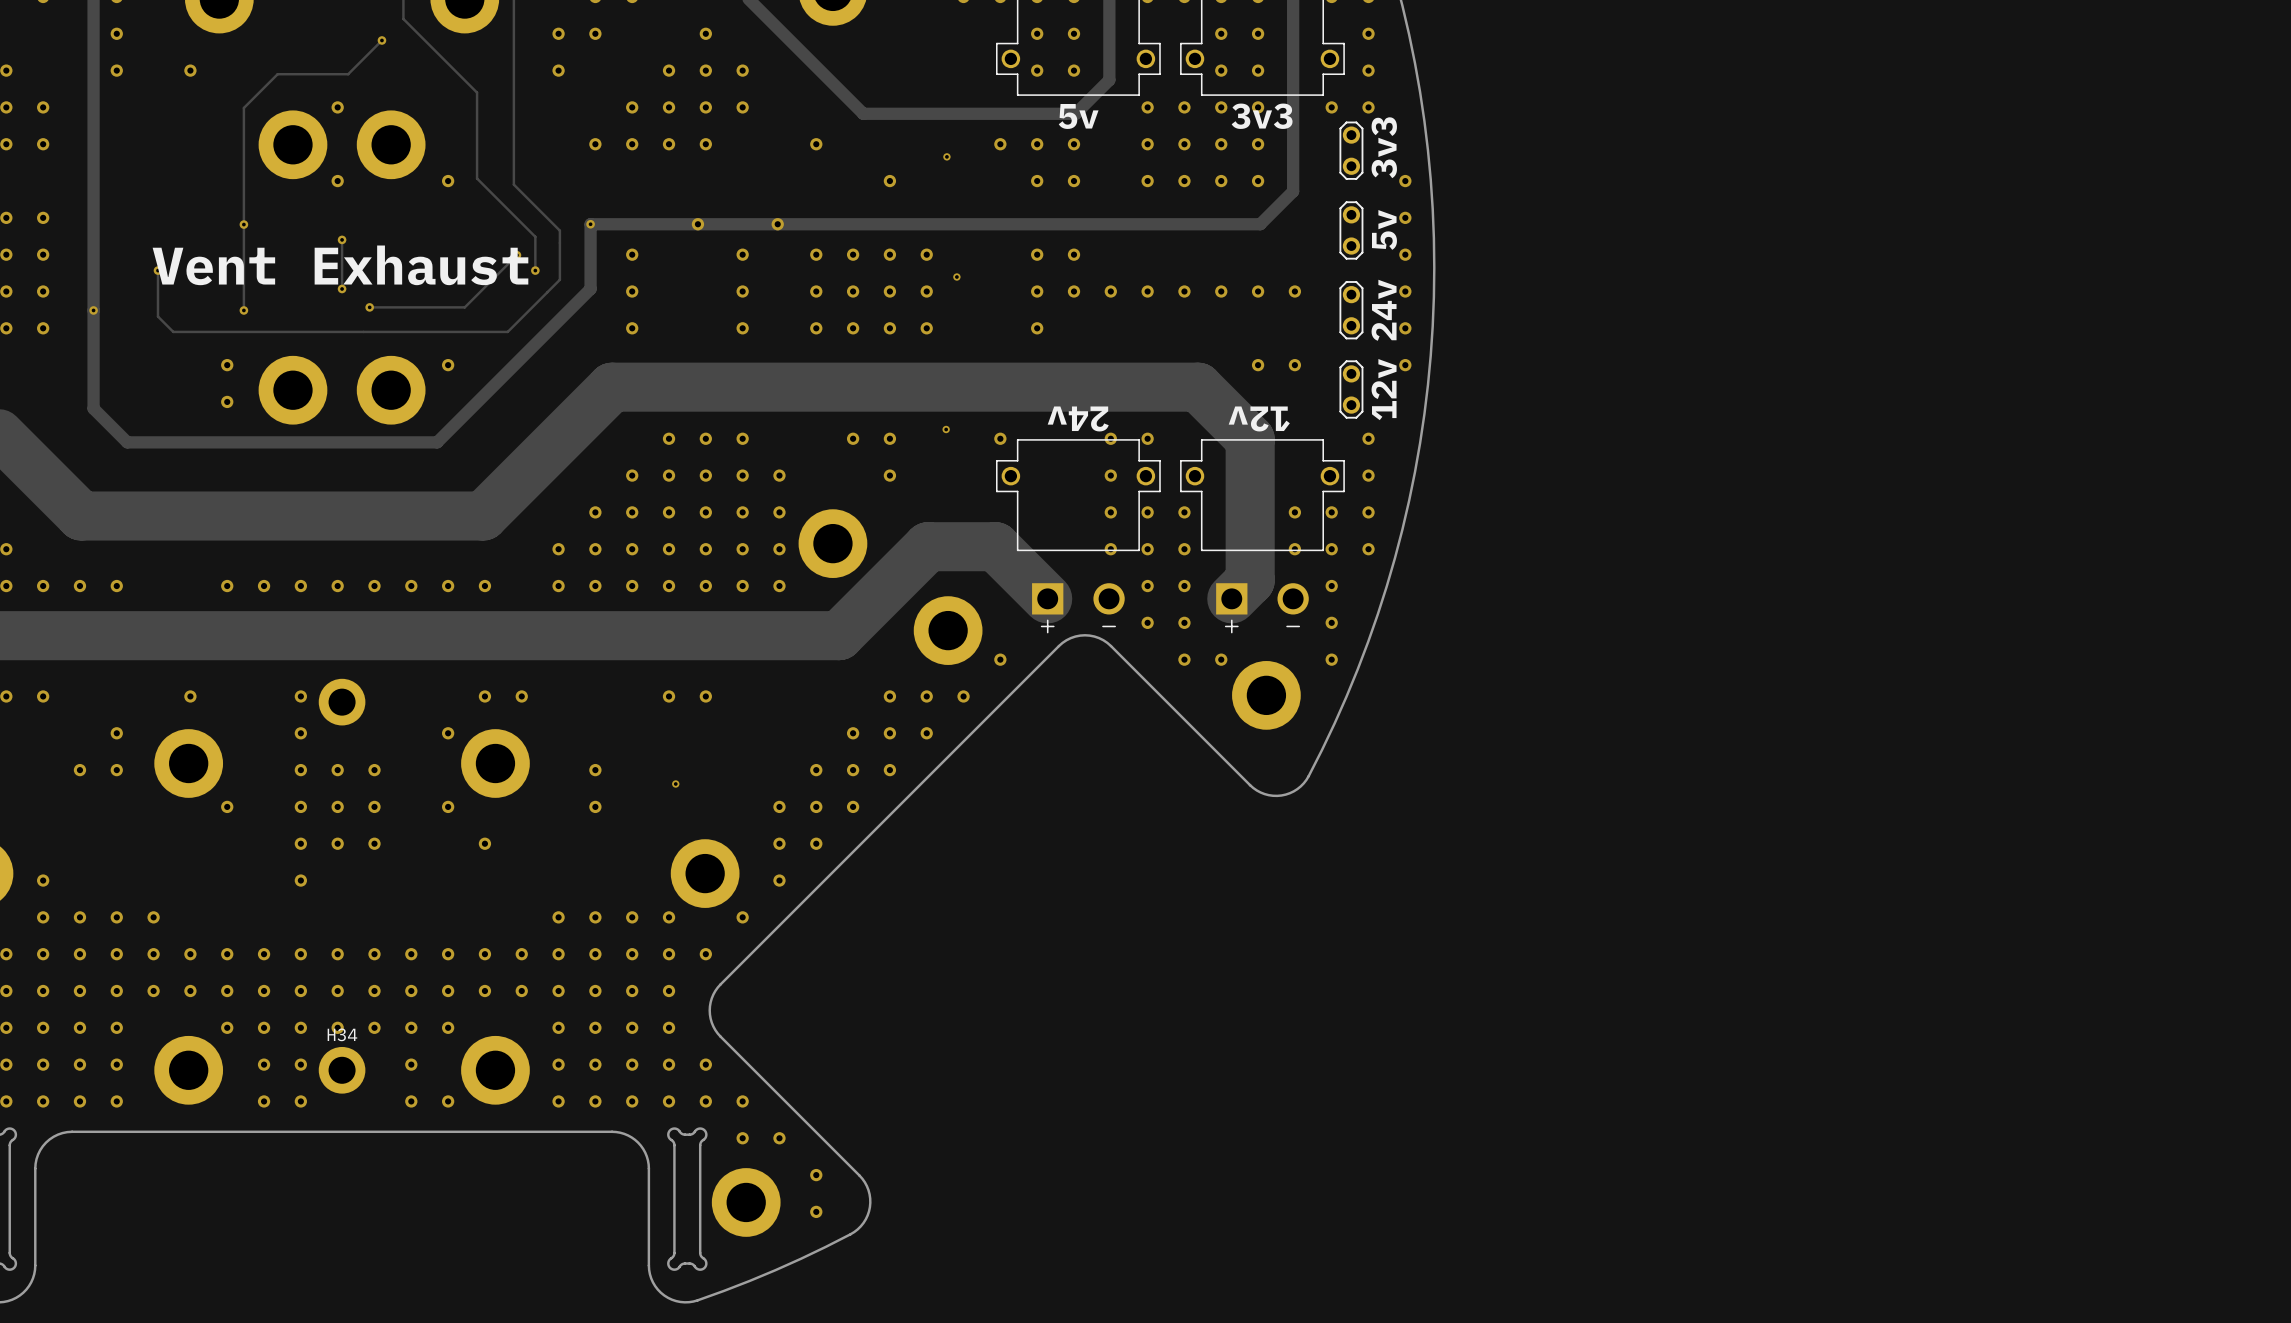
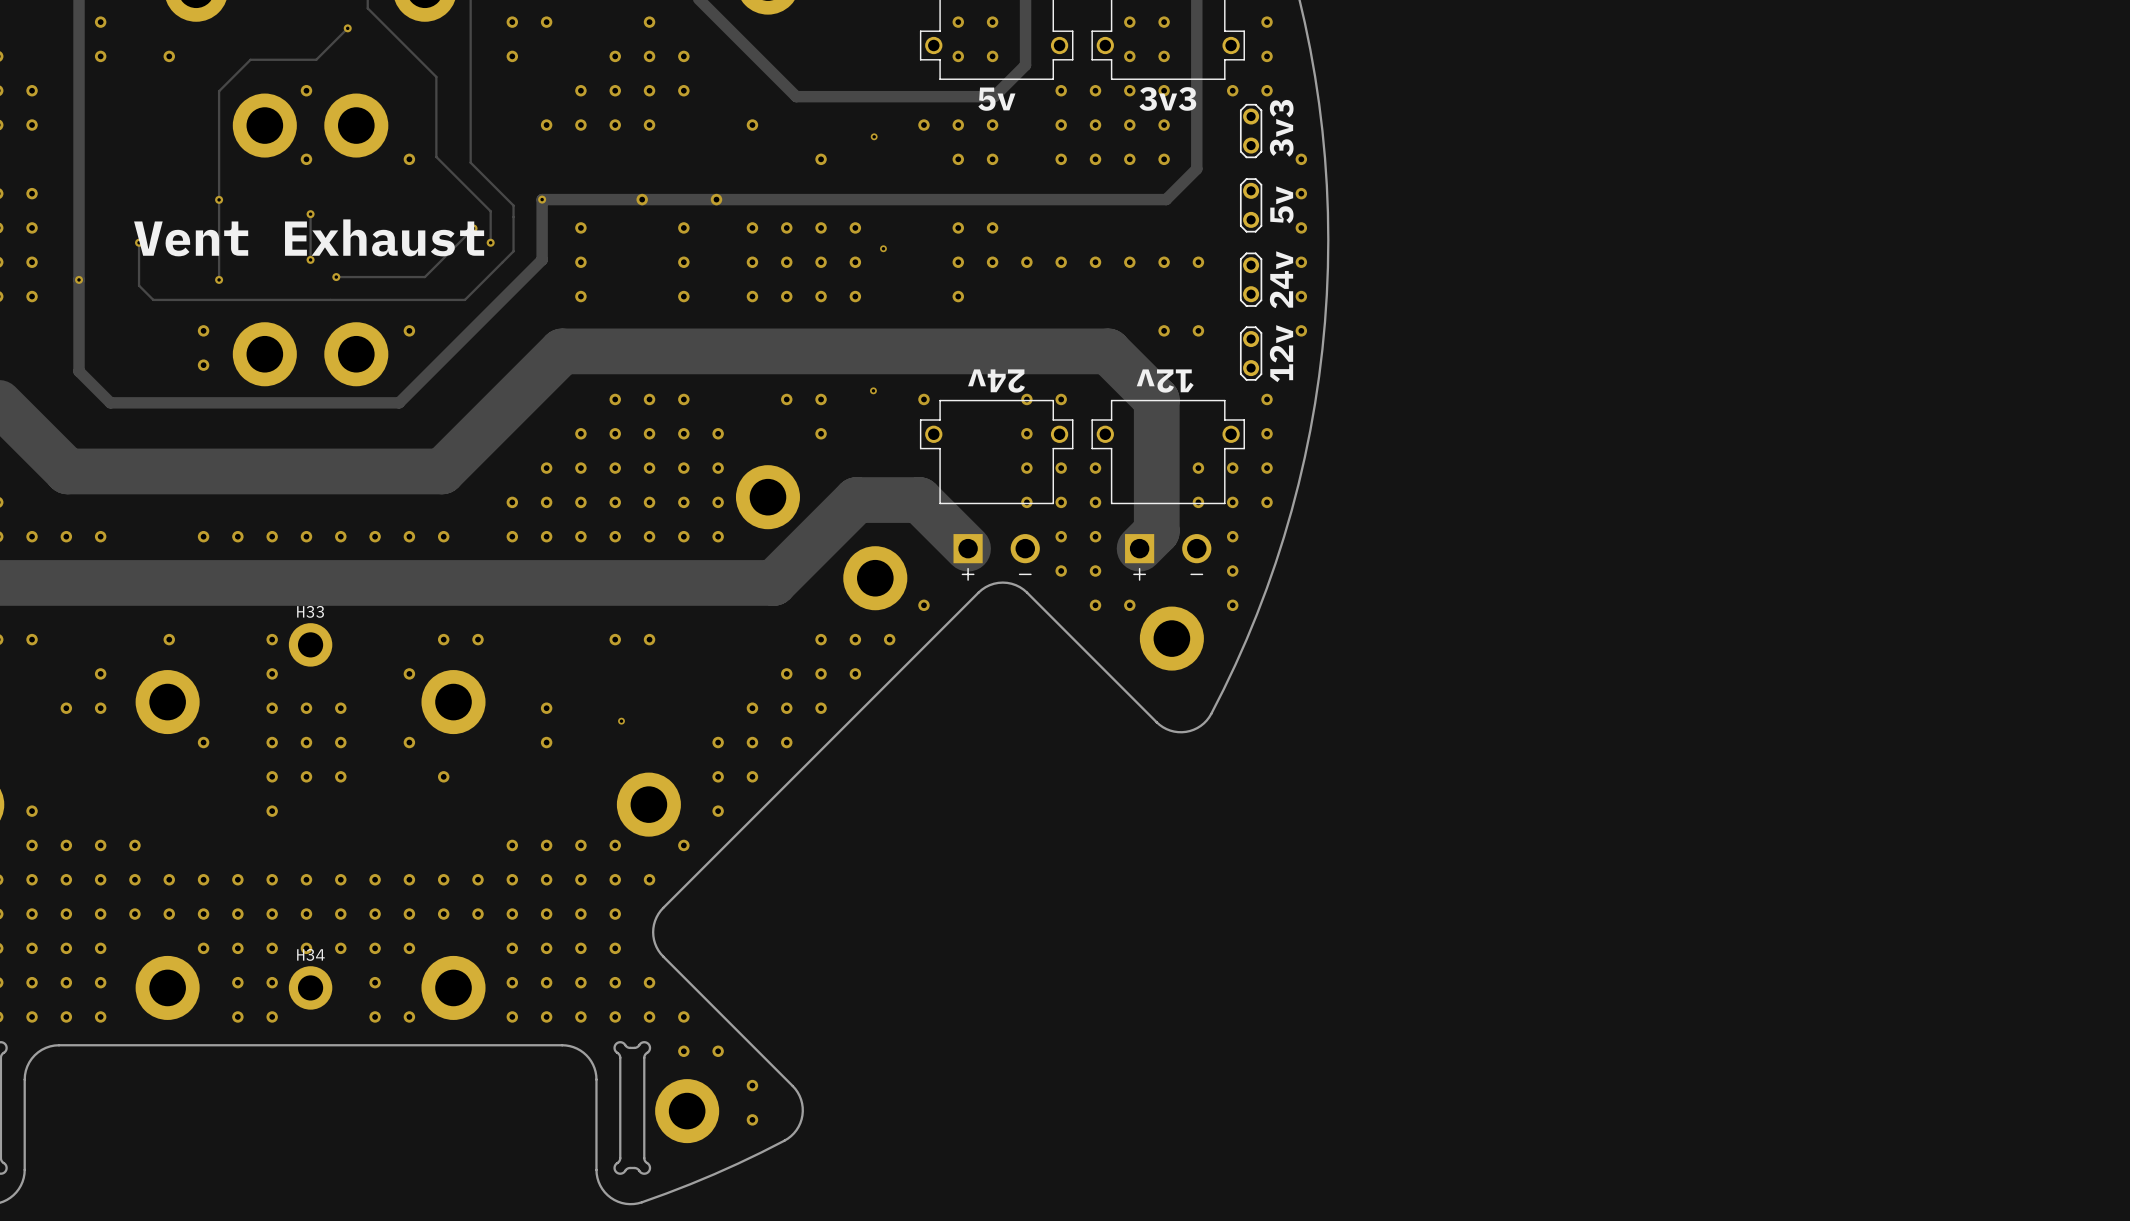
H33 name: none -> H33 (310, 611)

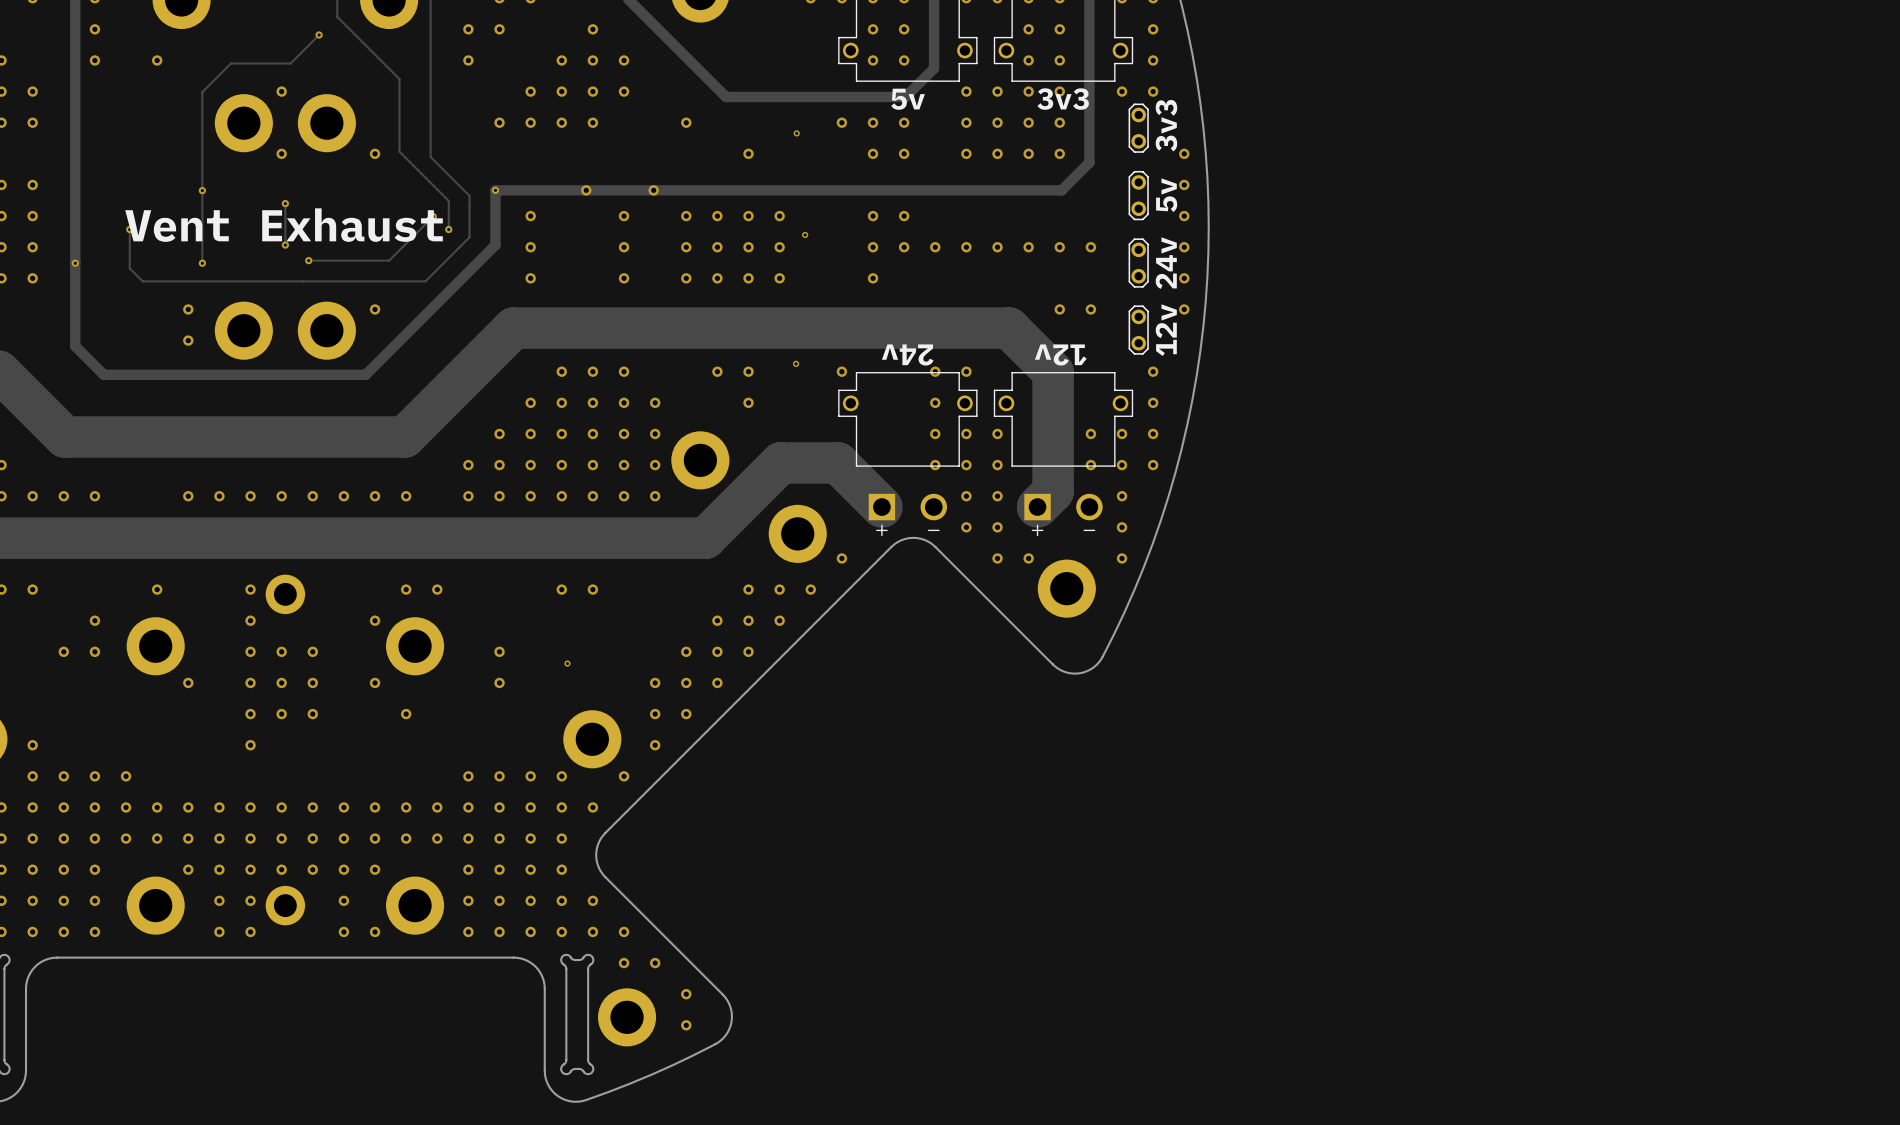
H33 name: H33 (310, 611) -> none
H34 name: H34 (310, 954) -> none

